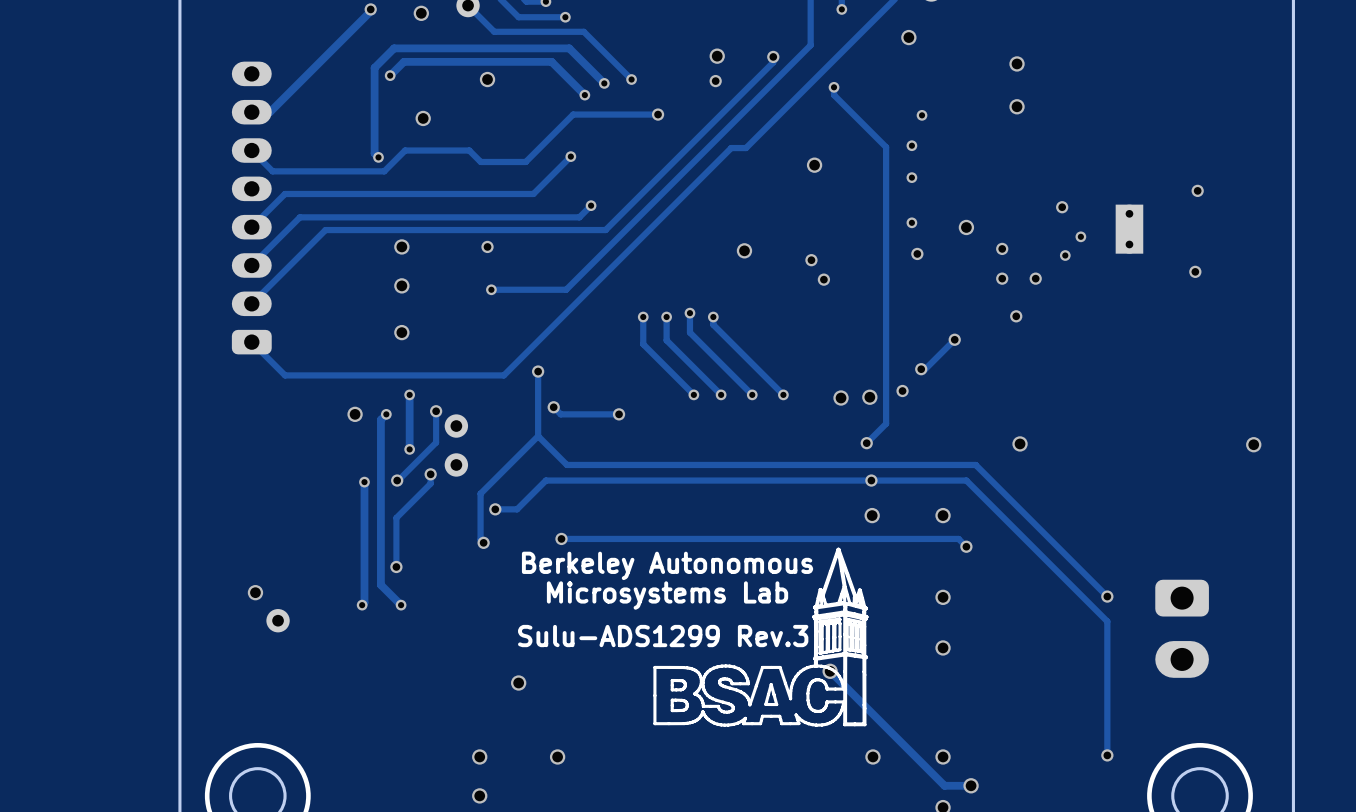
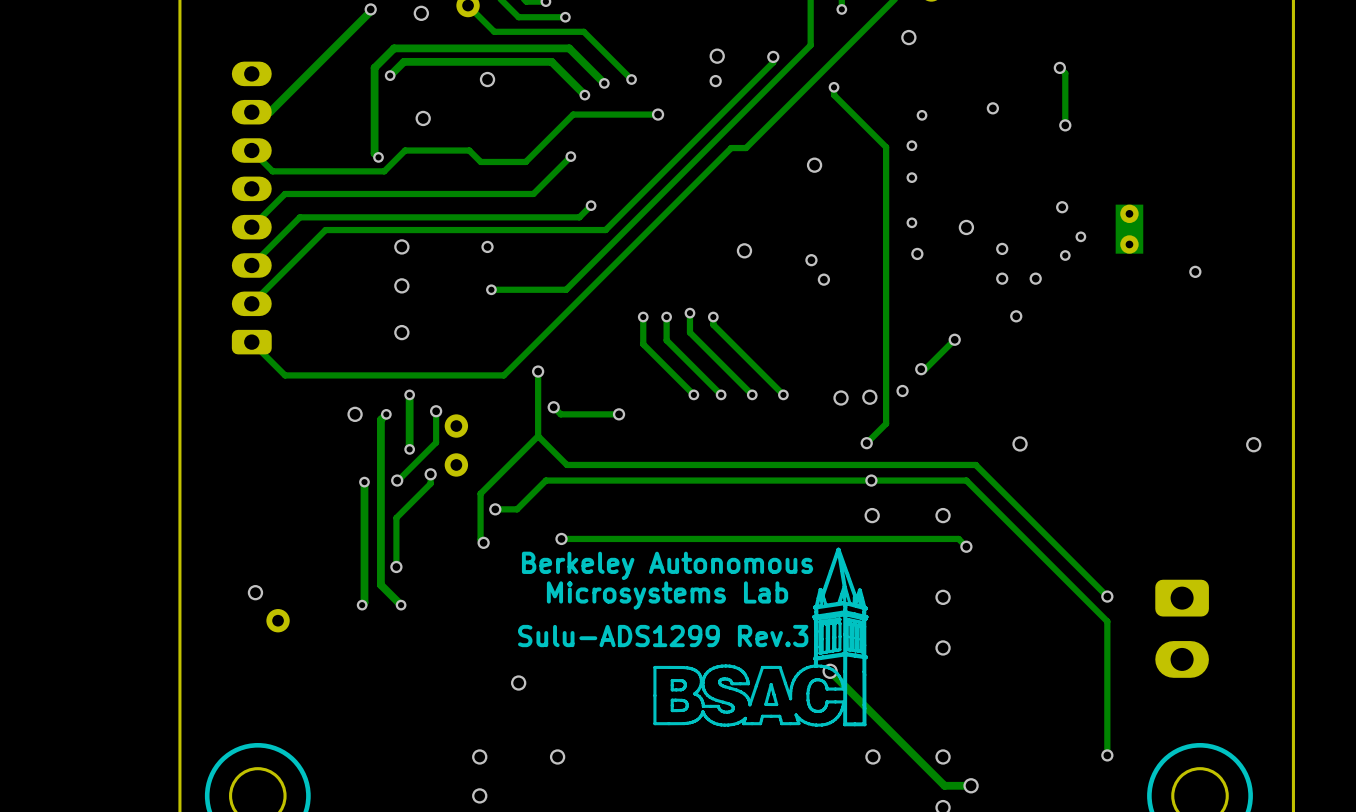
via: (1017, 63) -> none
track: none -> (1059, 67) (1065, 73) (1065, 125)
via: none -> (1059, 67)
via: (1017, 106) -> none
via: none -> (992, 108)
via: none -> (1065, 125)
via: (1197, 190) -> none

